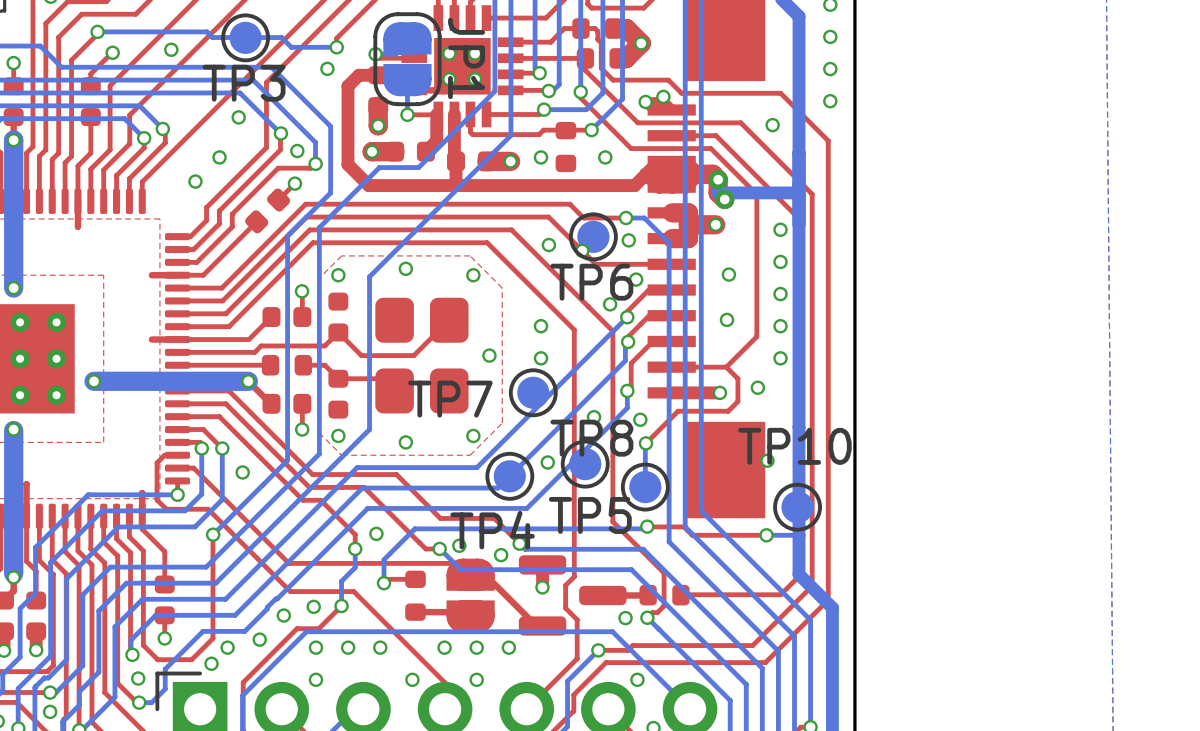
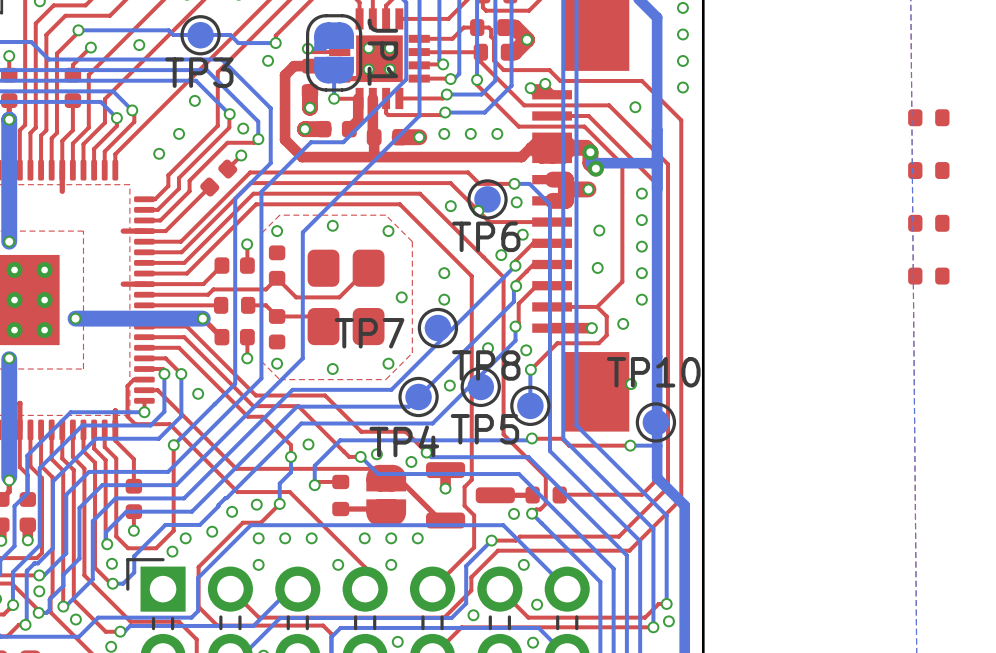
bottom track: none -> (486, 111) (445, 112)
top track: (591, 130) (542, 131) -> none
via: (591, 130) -> none
via: none -> (445, 112)
part: none -> (928, 117)
part: (565, 147) -> none
via: none -> (470, 133)
part: none -> (928, 170)
part: none -> (928, 223)
part: none -> (928, 276)

